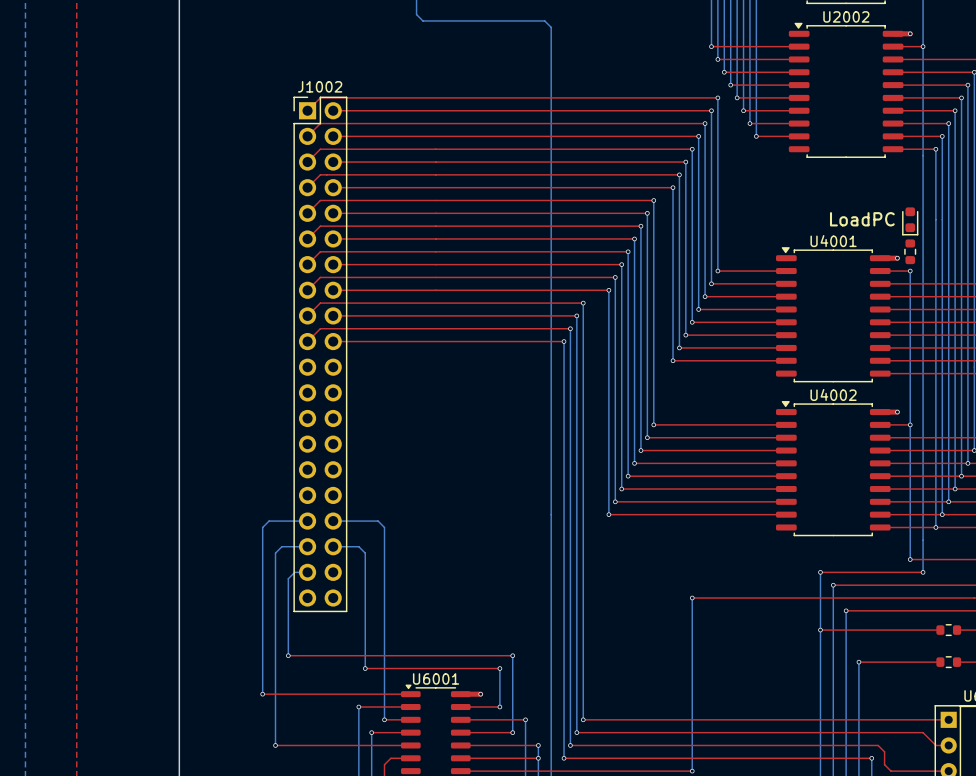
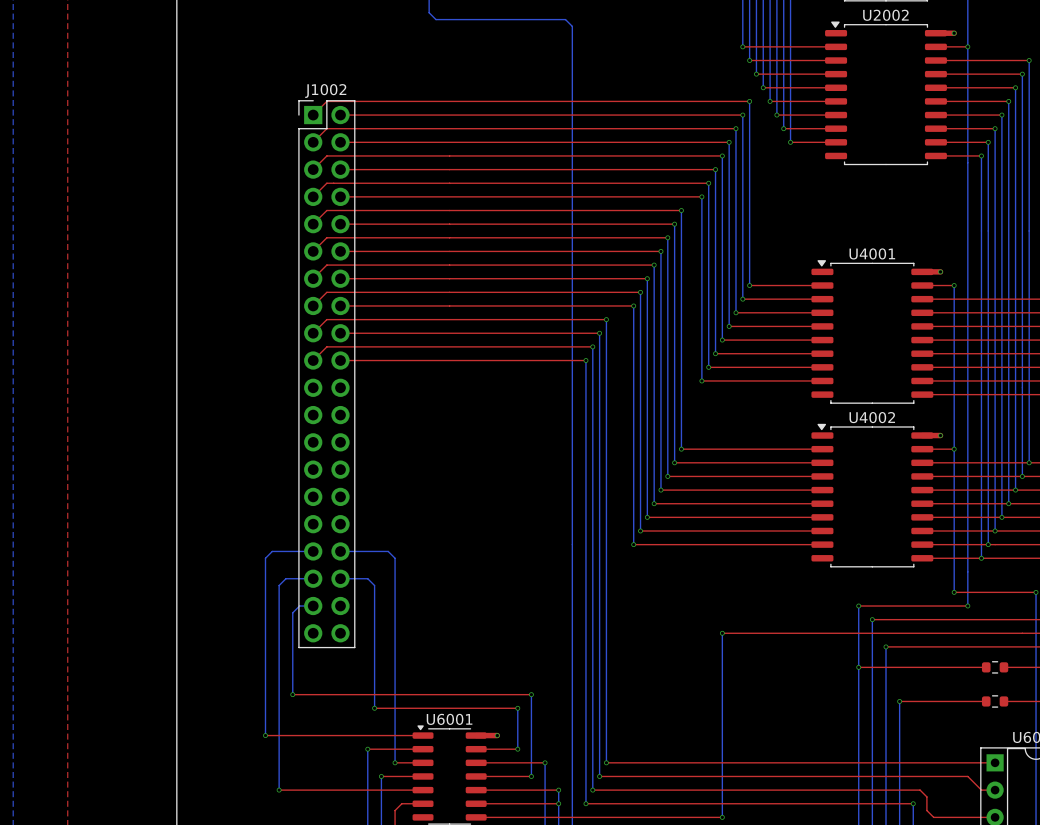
text: LoadPC (862, 219) -> none
part: (910, 221) -> none
part: (910, 251) -> none

